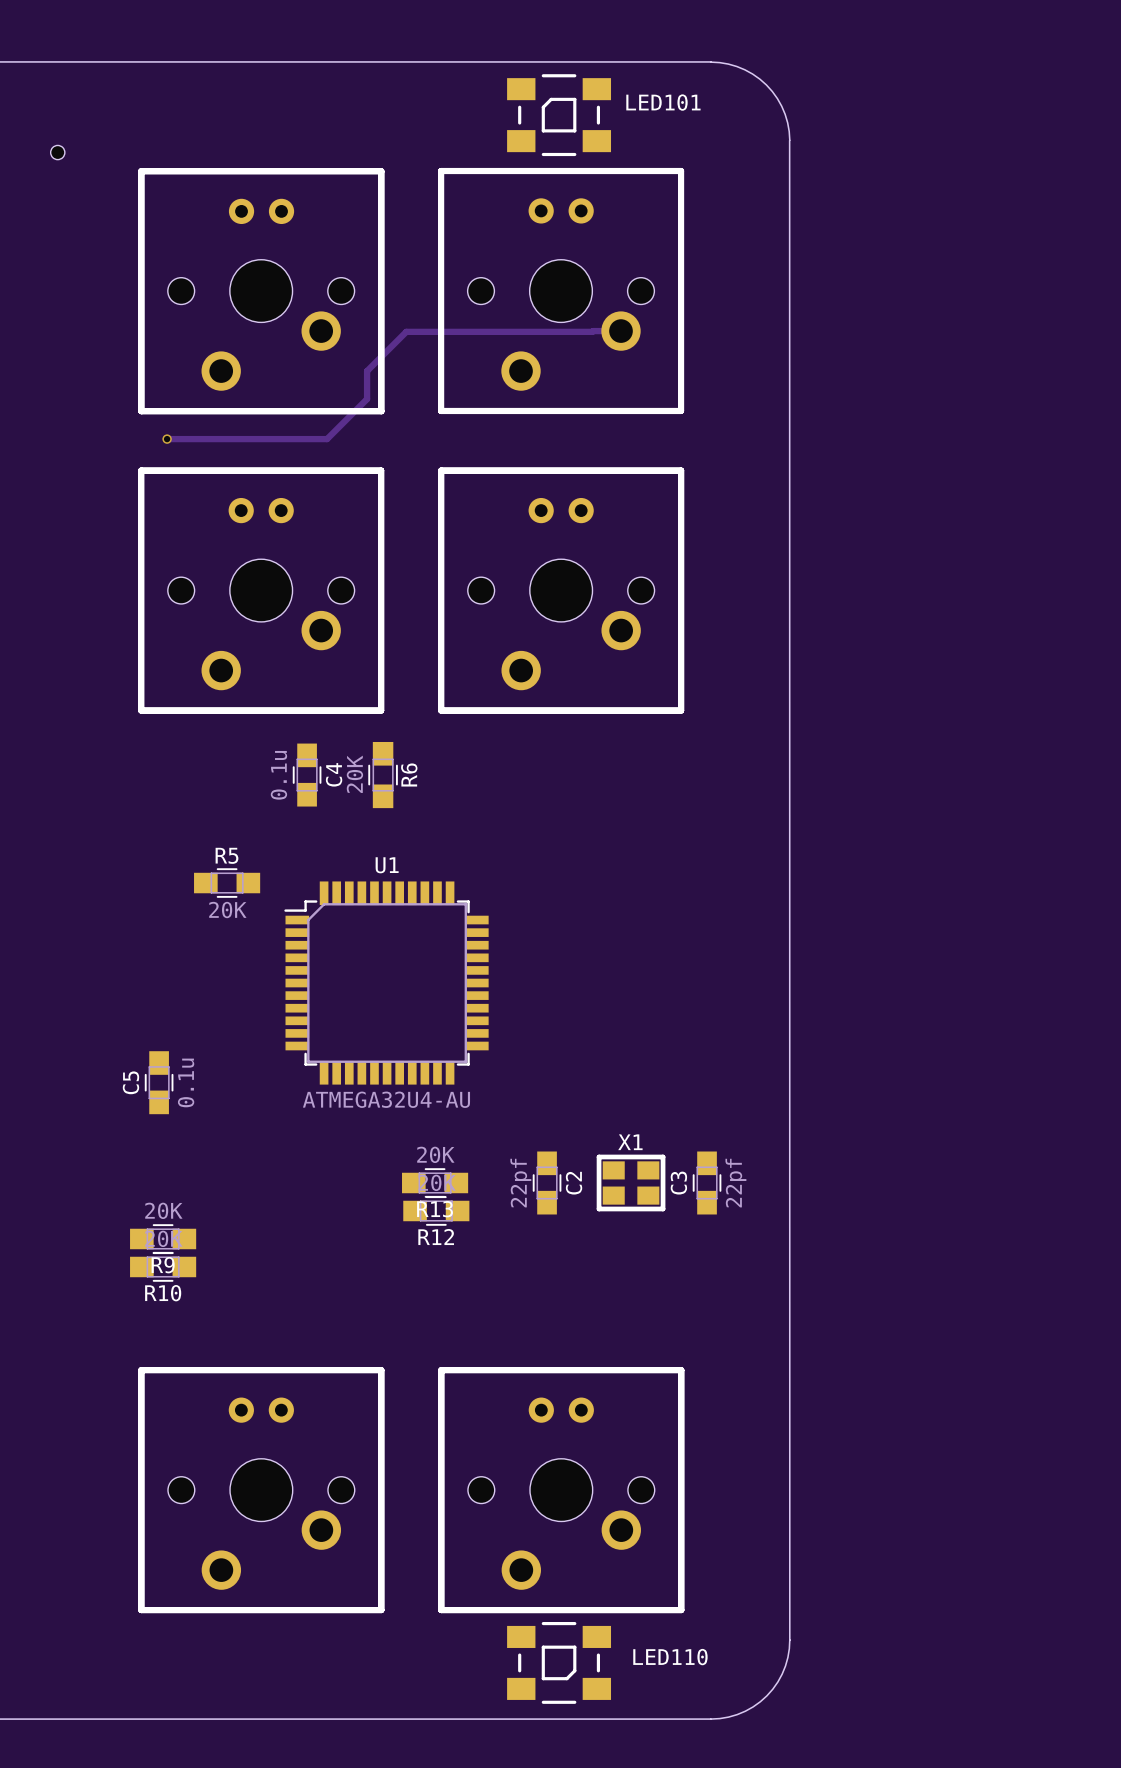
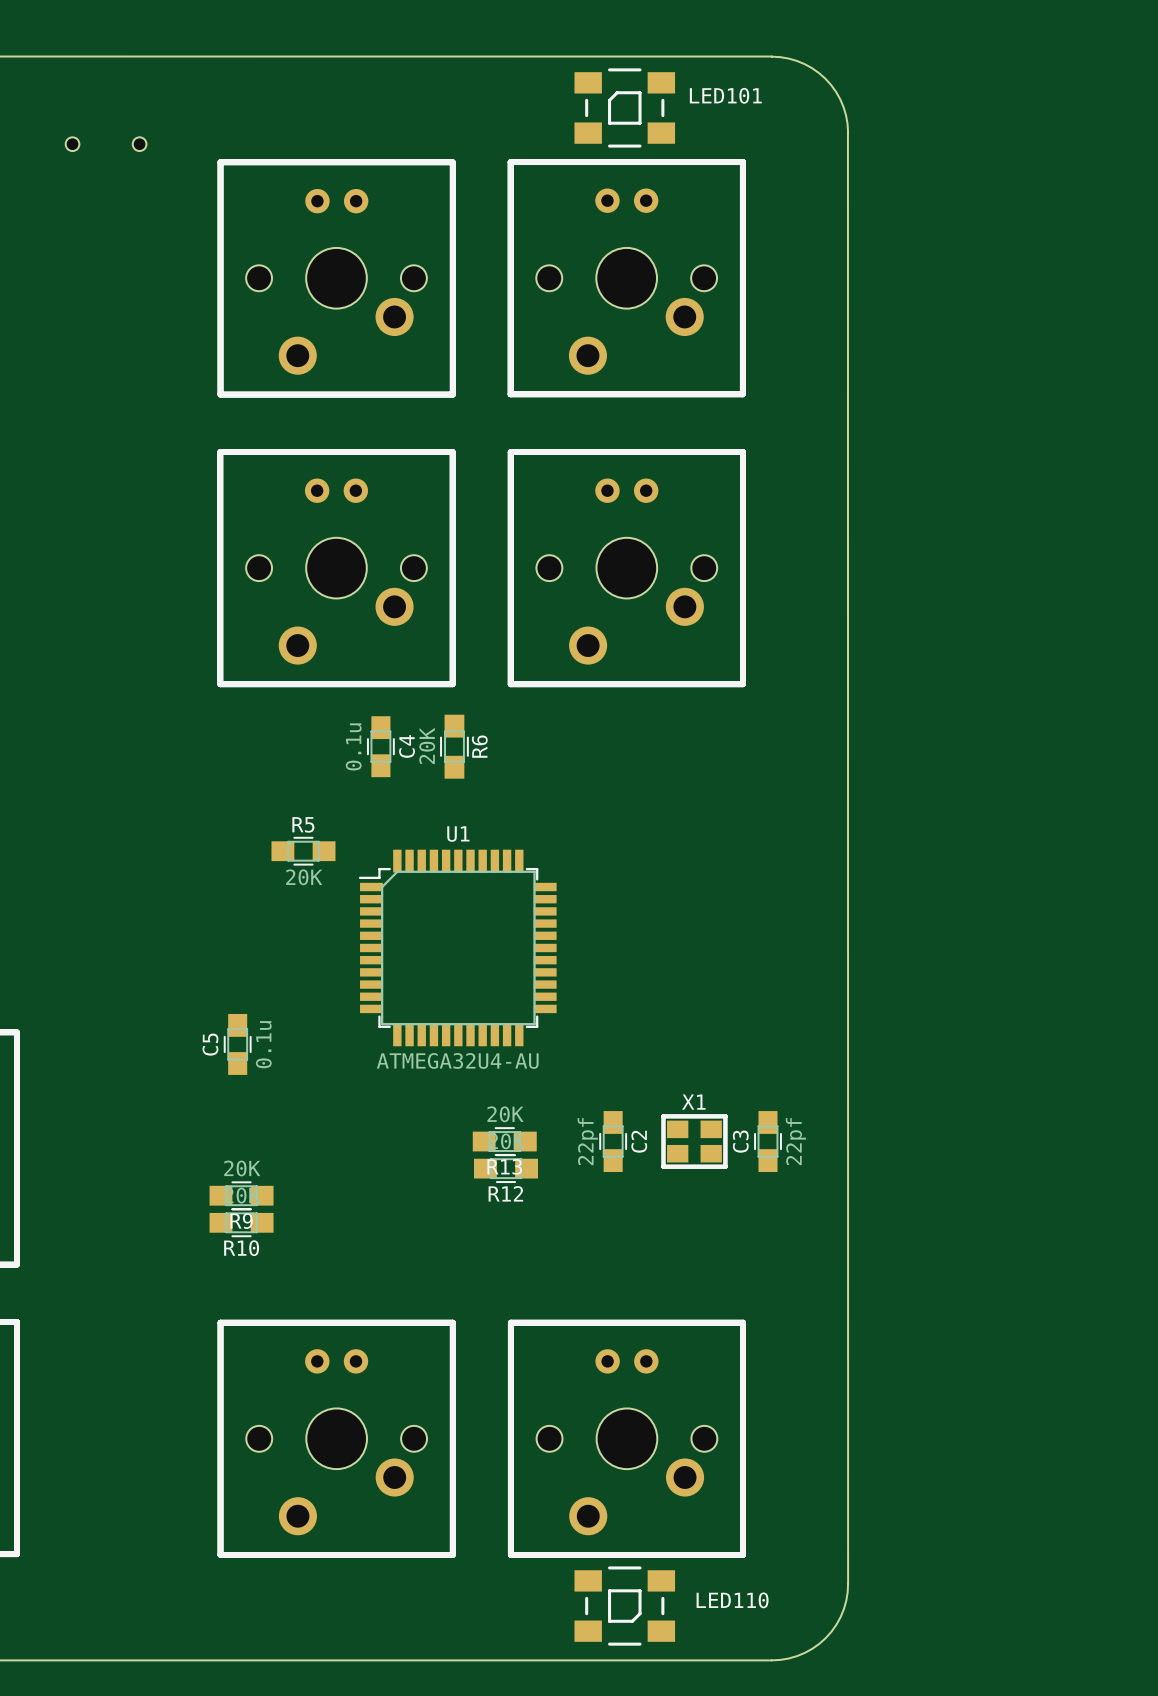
track: (621, 331) (406, 331) (367, 371) (367, 399) (327, 439) (167, 439) -> none
via: (167, 439) -> none

